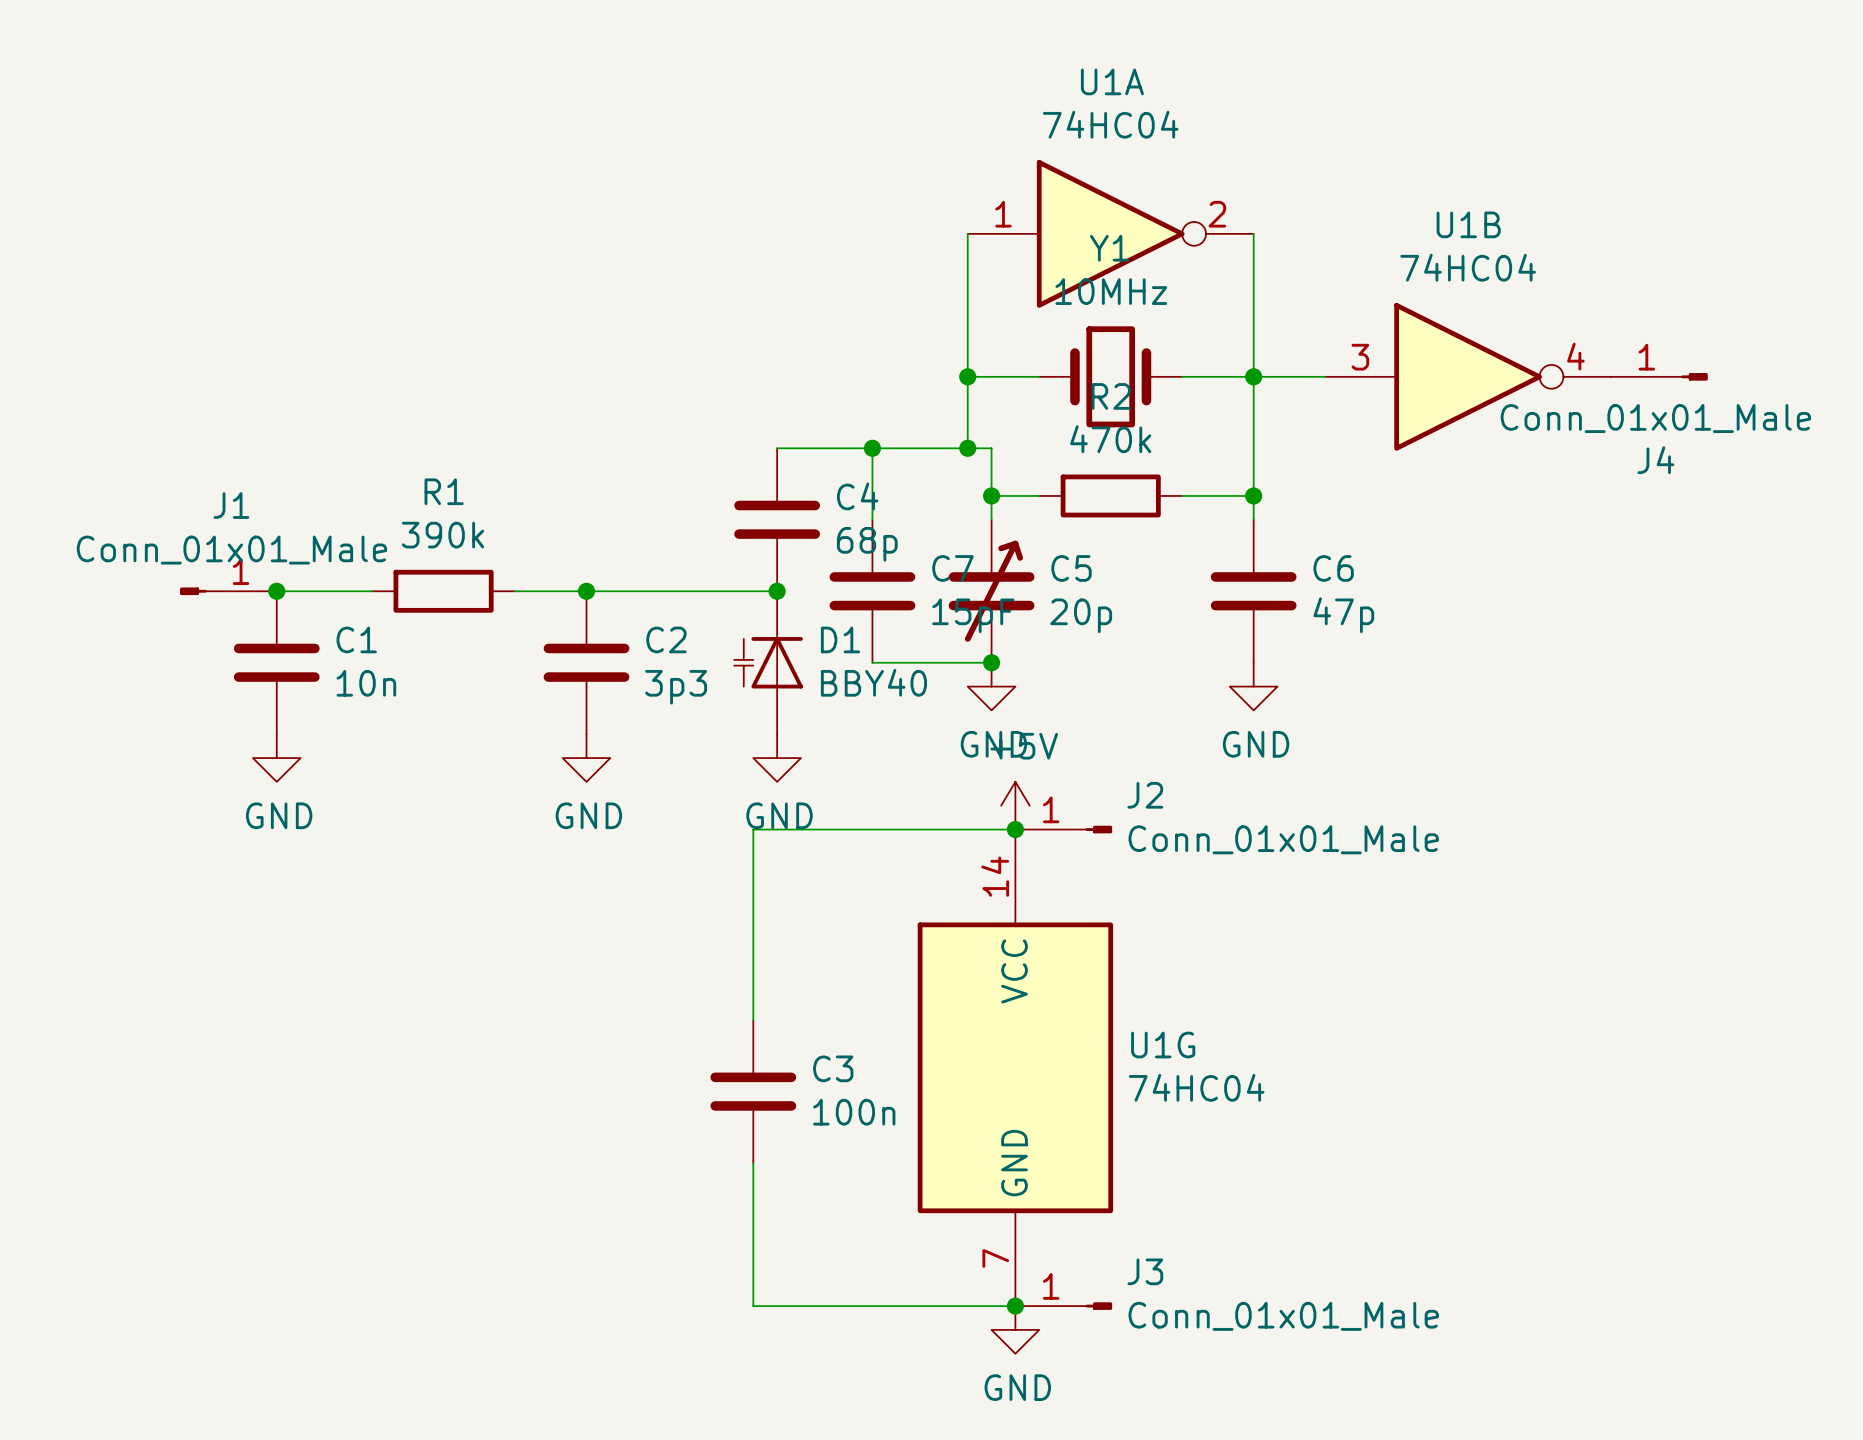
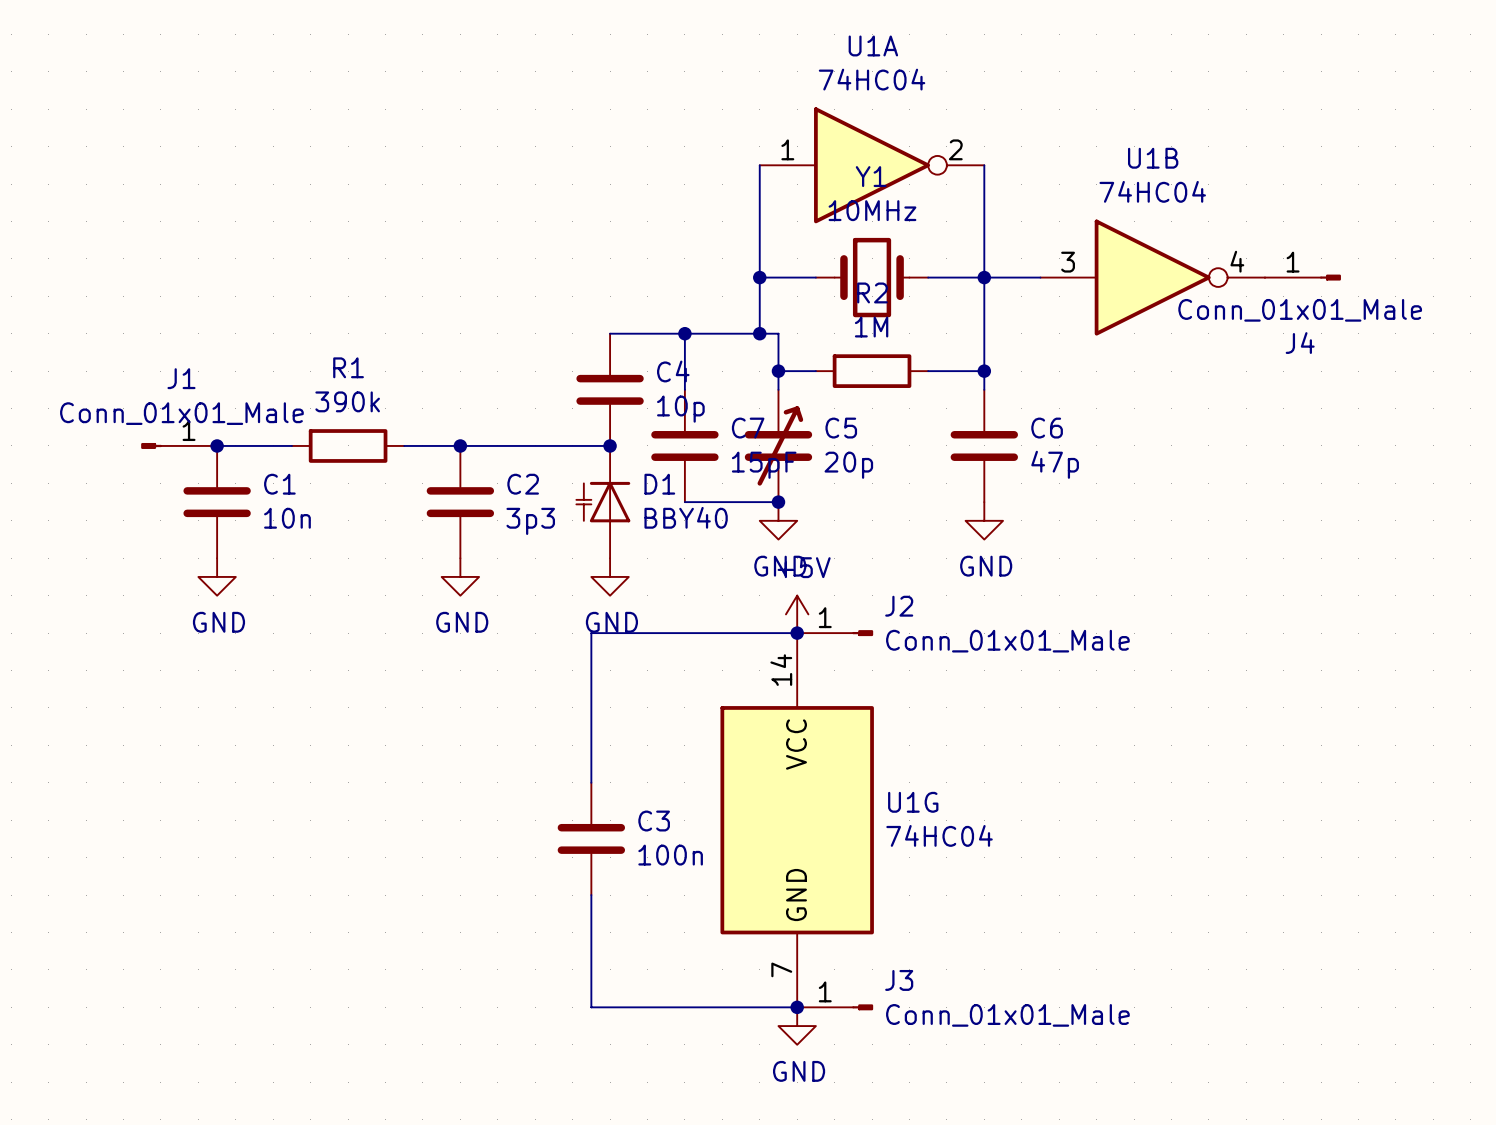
R2 value: 470k (1110, 439) -> 1M (871, 327)
C4 value: 68p (867, 544) -> 10p (680, 409)

